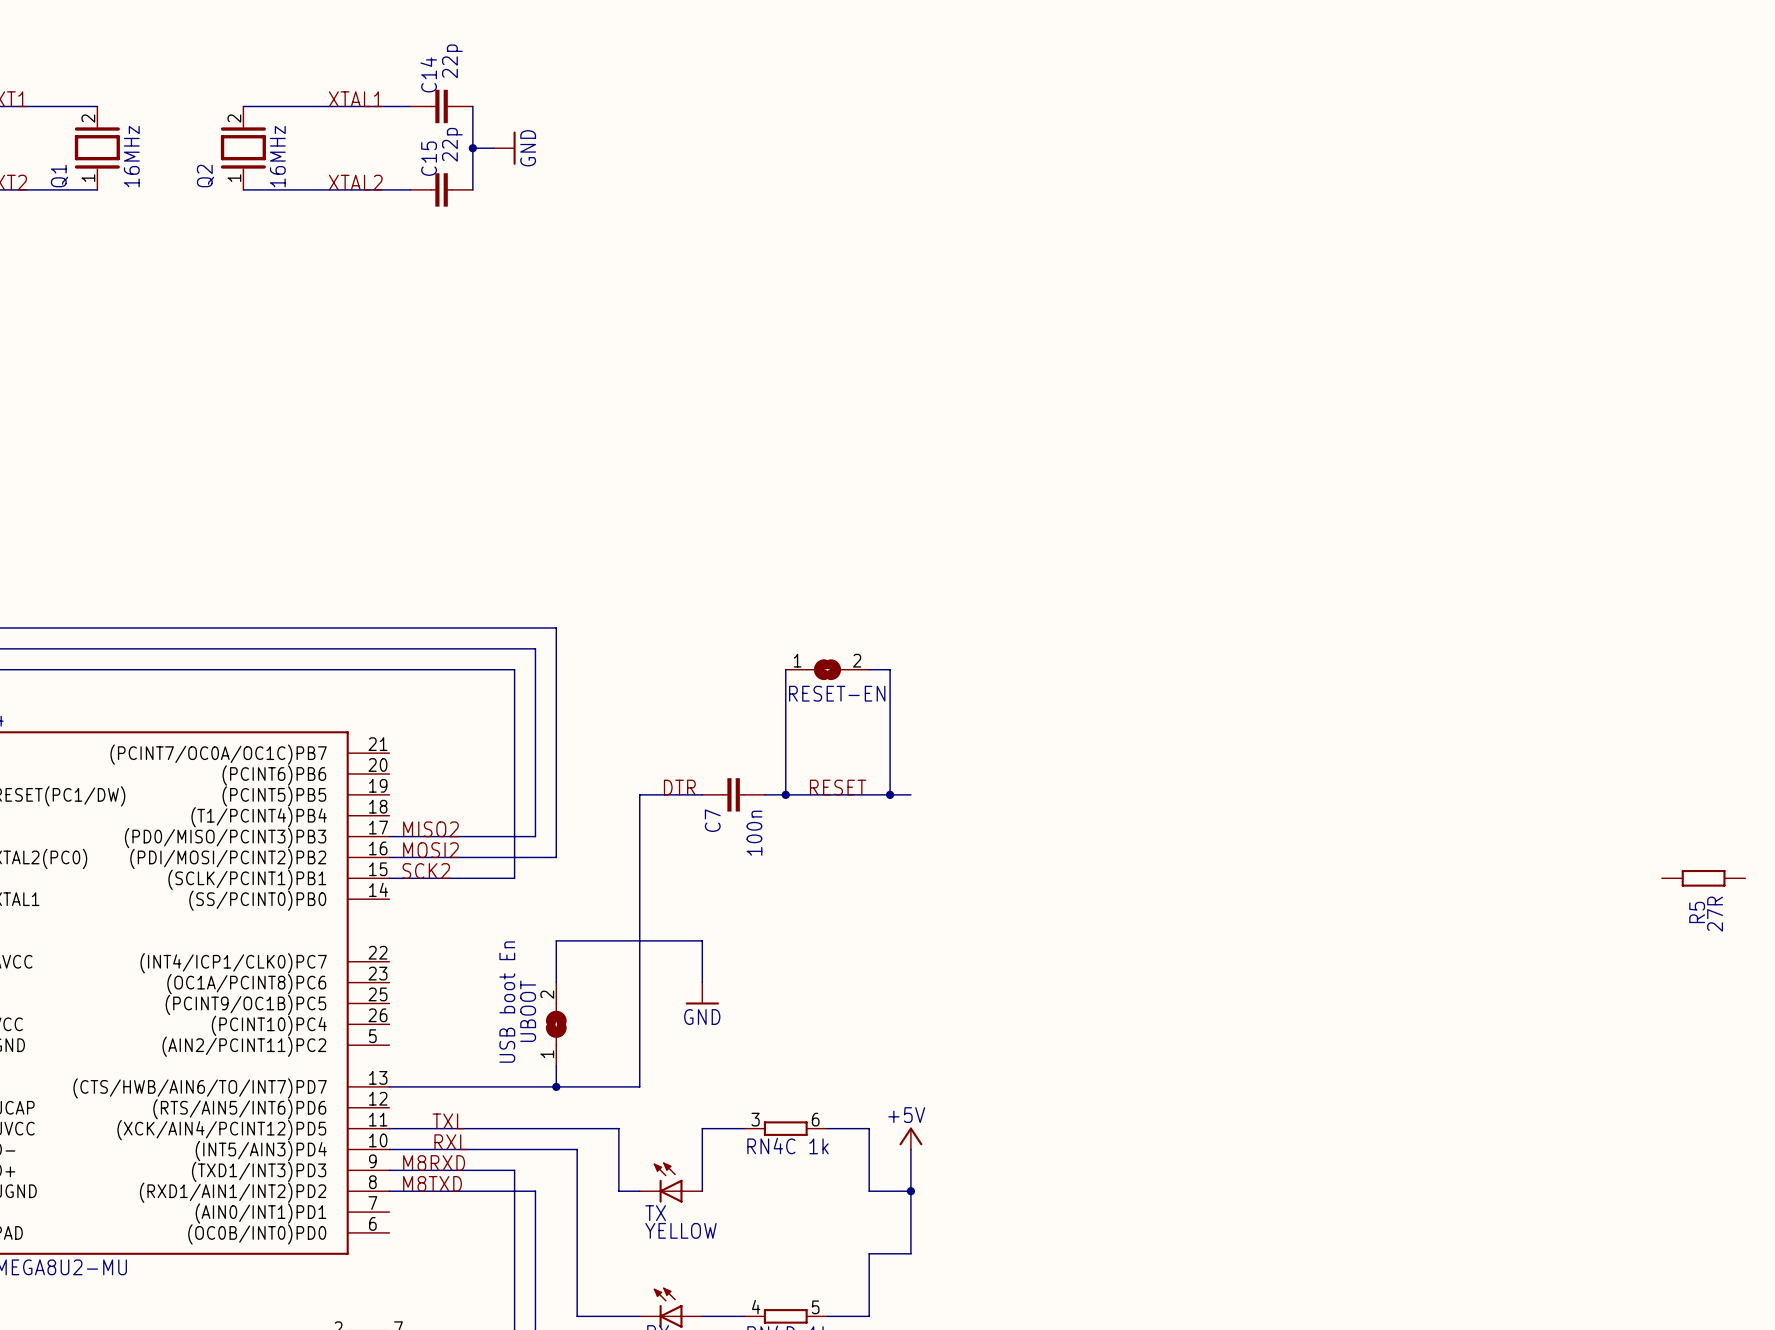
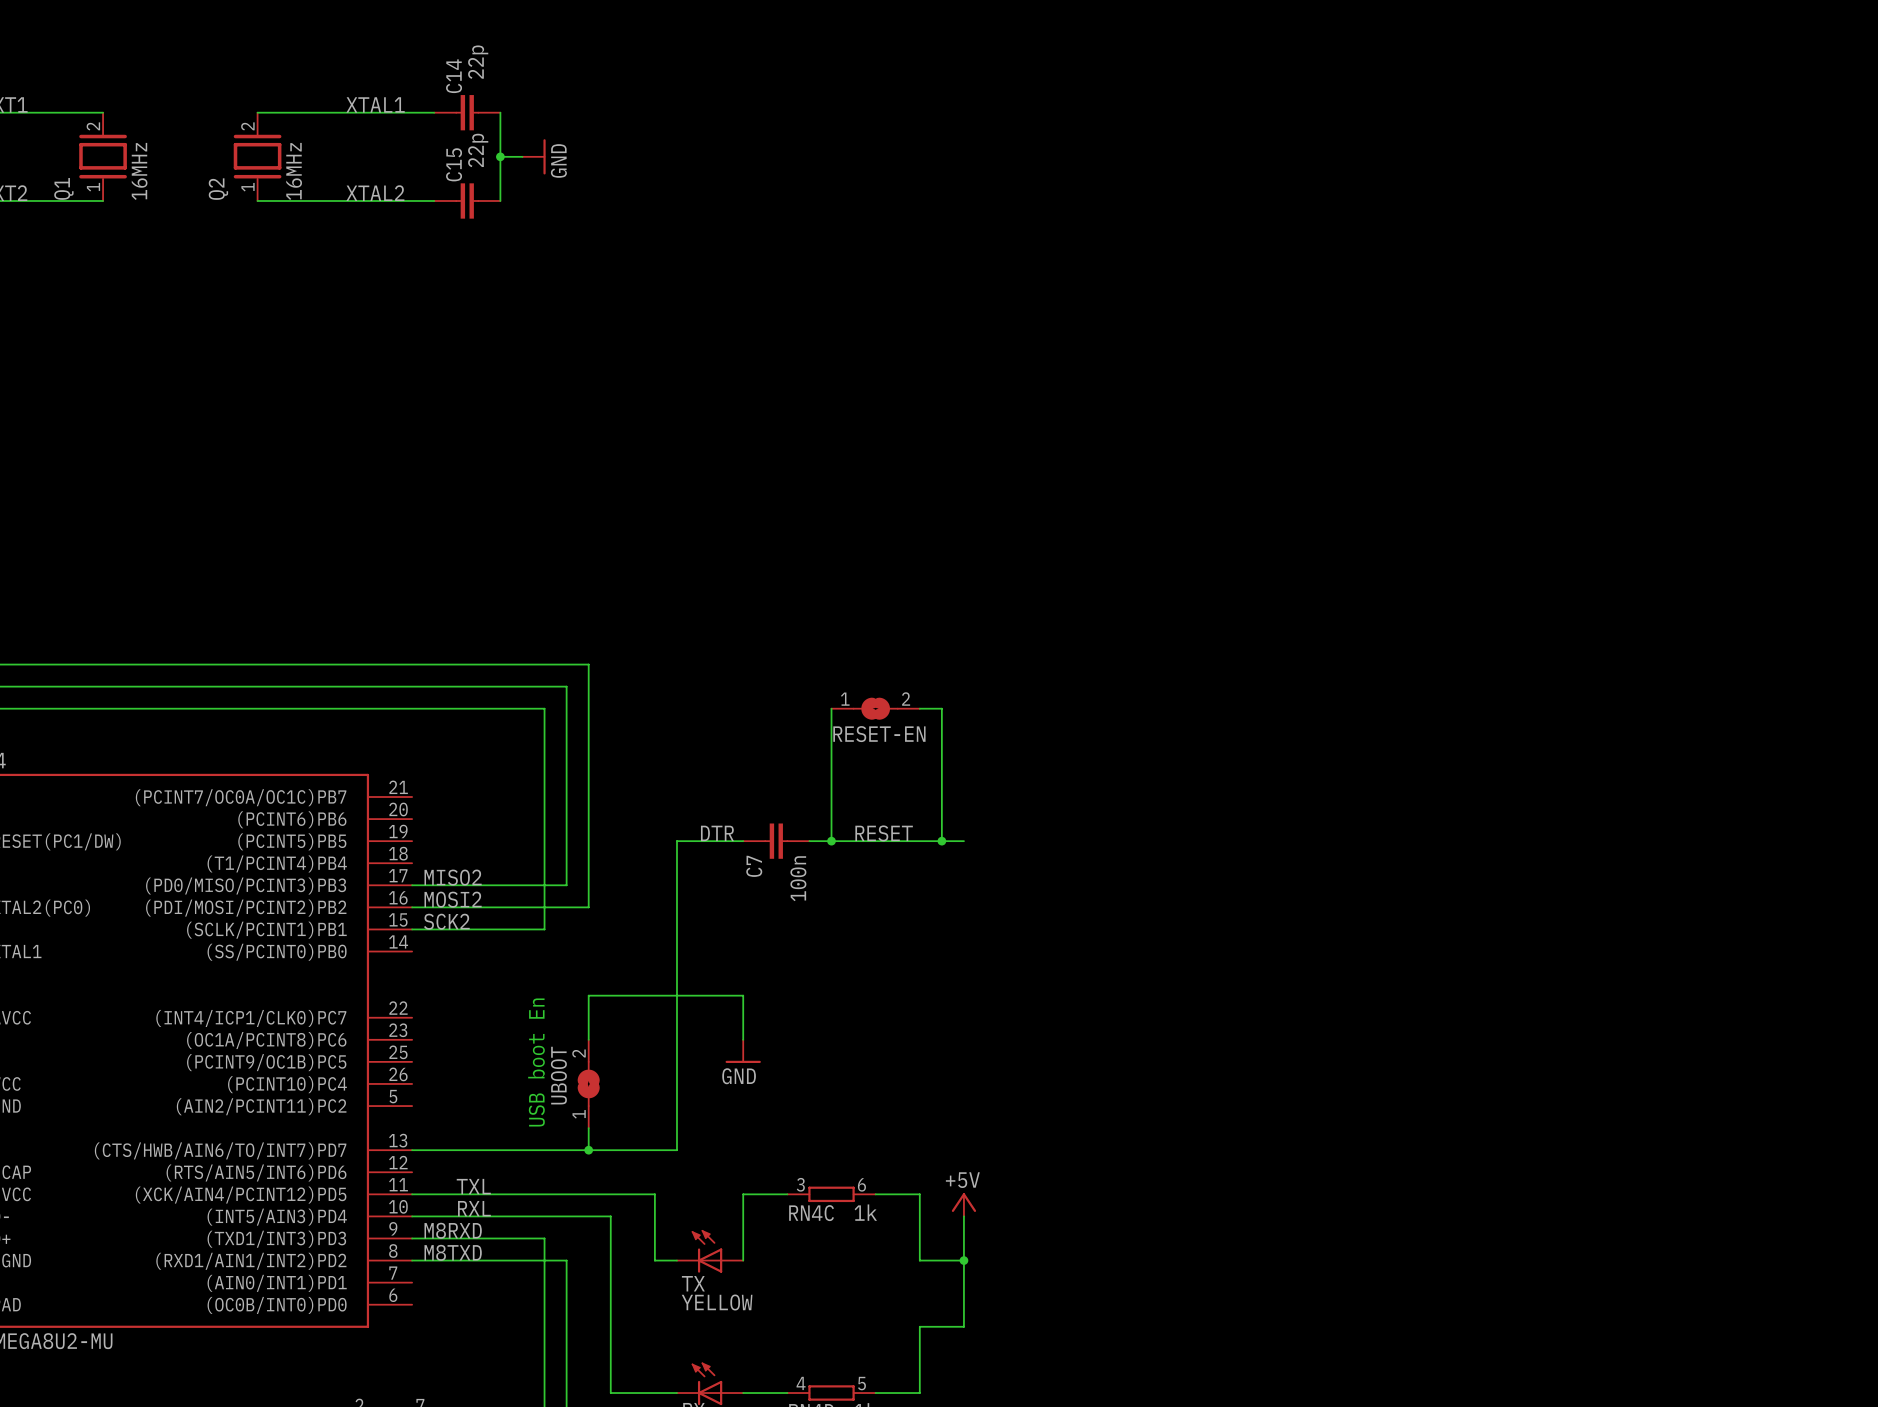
R5: 27R (1703, 878) -> none

